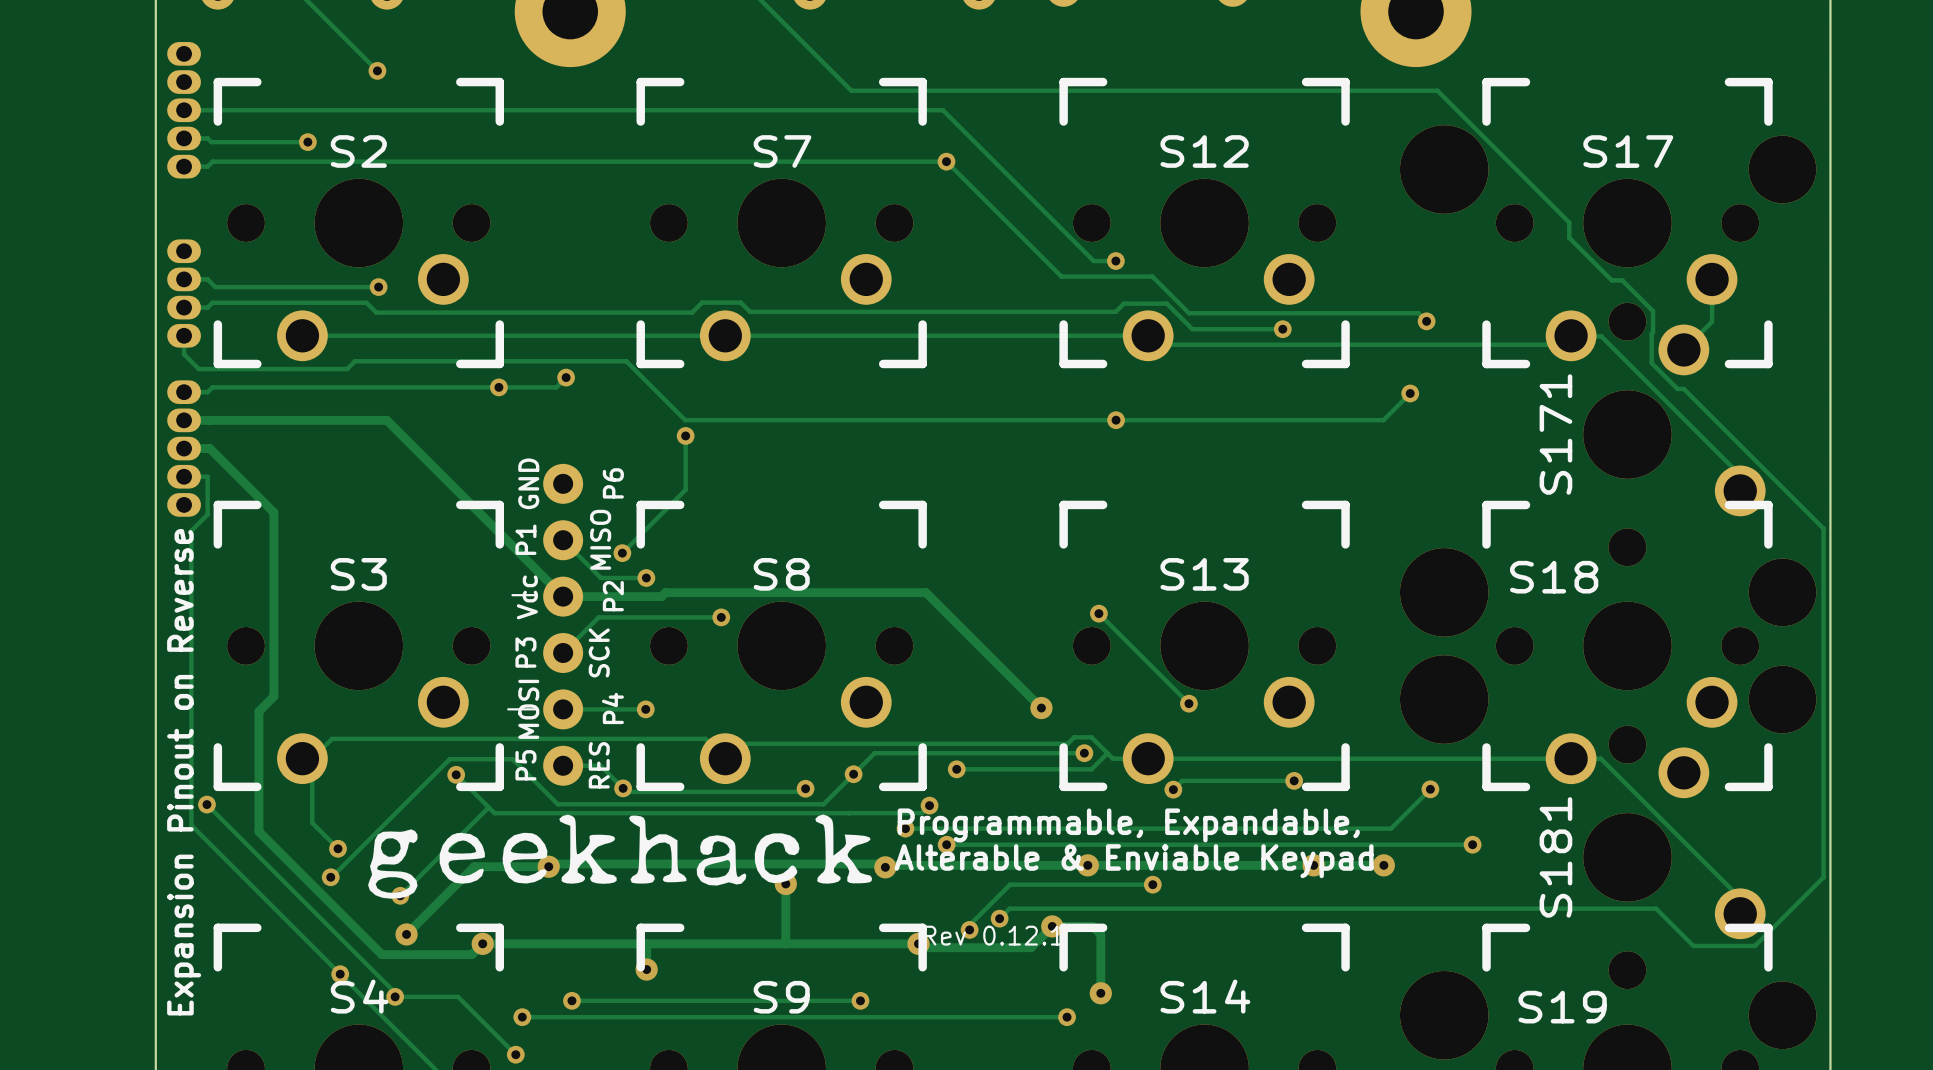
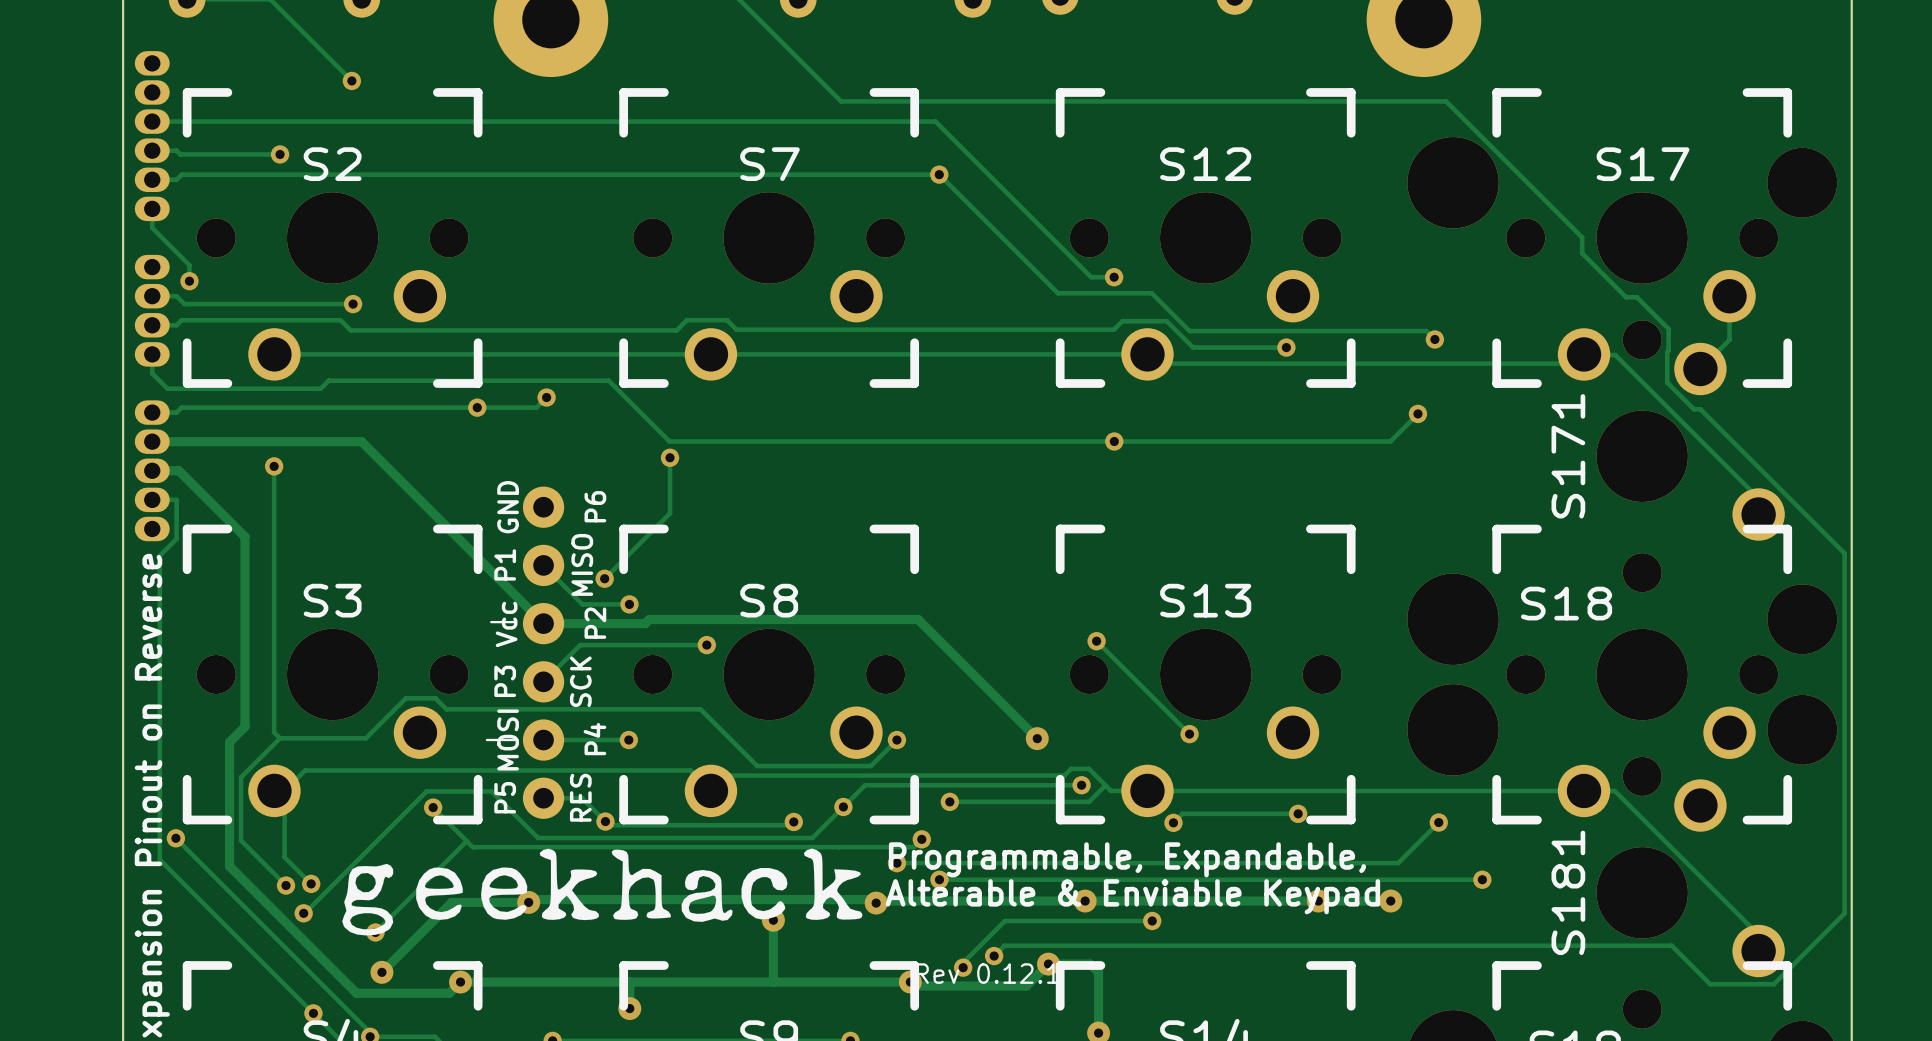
track: none -> (152, 208) (152, 227) (189, 265) (189, 281)
part: none -> (152, 208)
via: none -> (189, 281)
track: none -> (274, 466) (274, 732) (280, 738)
via: none -> (274, 466)
track: none -> (280, 738) (365, 738) (405, 698) (435, 698) (446, 709) (700, 709) (757, 766) (870, 766) (896, 740)
track: none -> (280, 738) (241, 777) (241, 840) (286, 885)
via: none -> (896, 740)
via: none -> (286, 885)

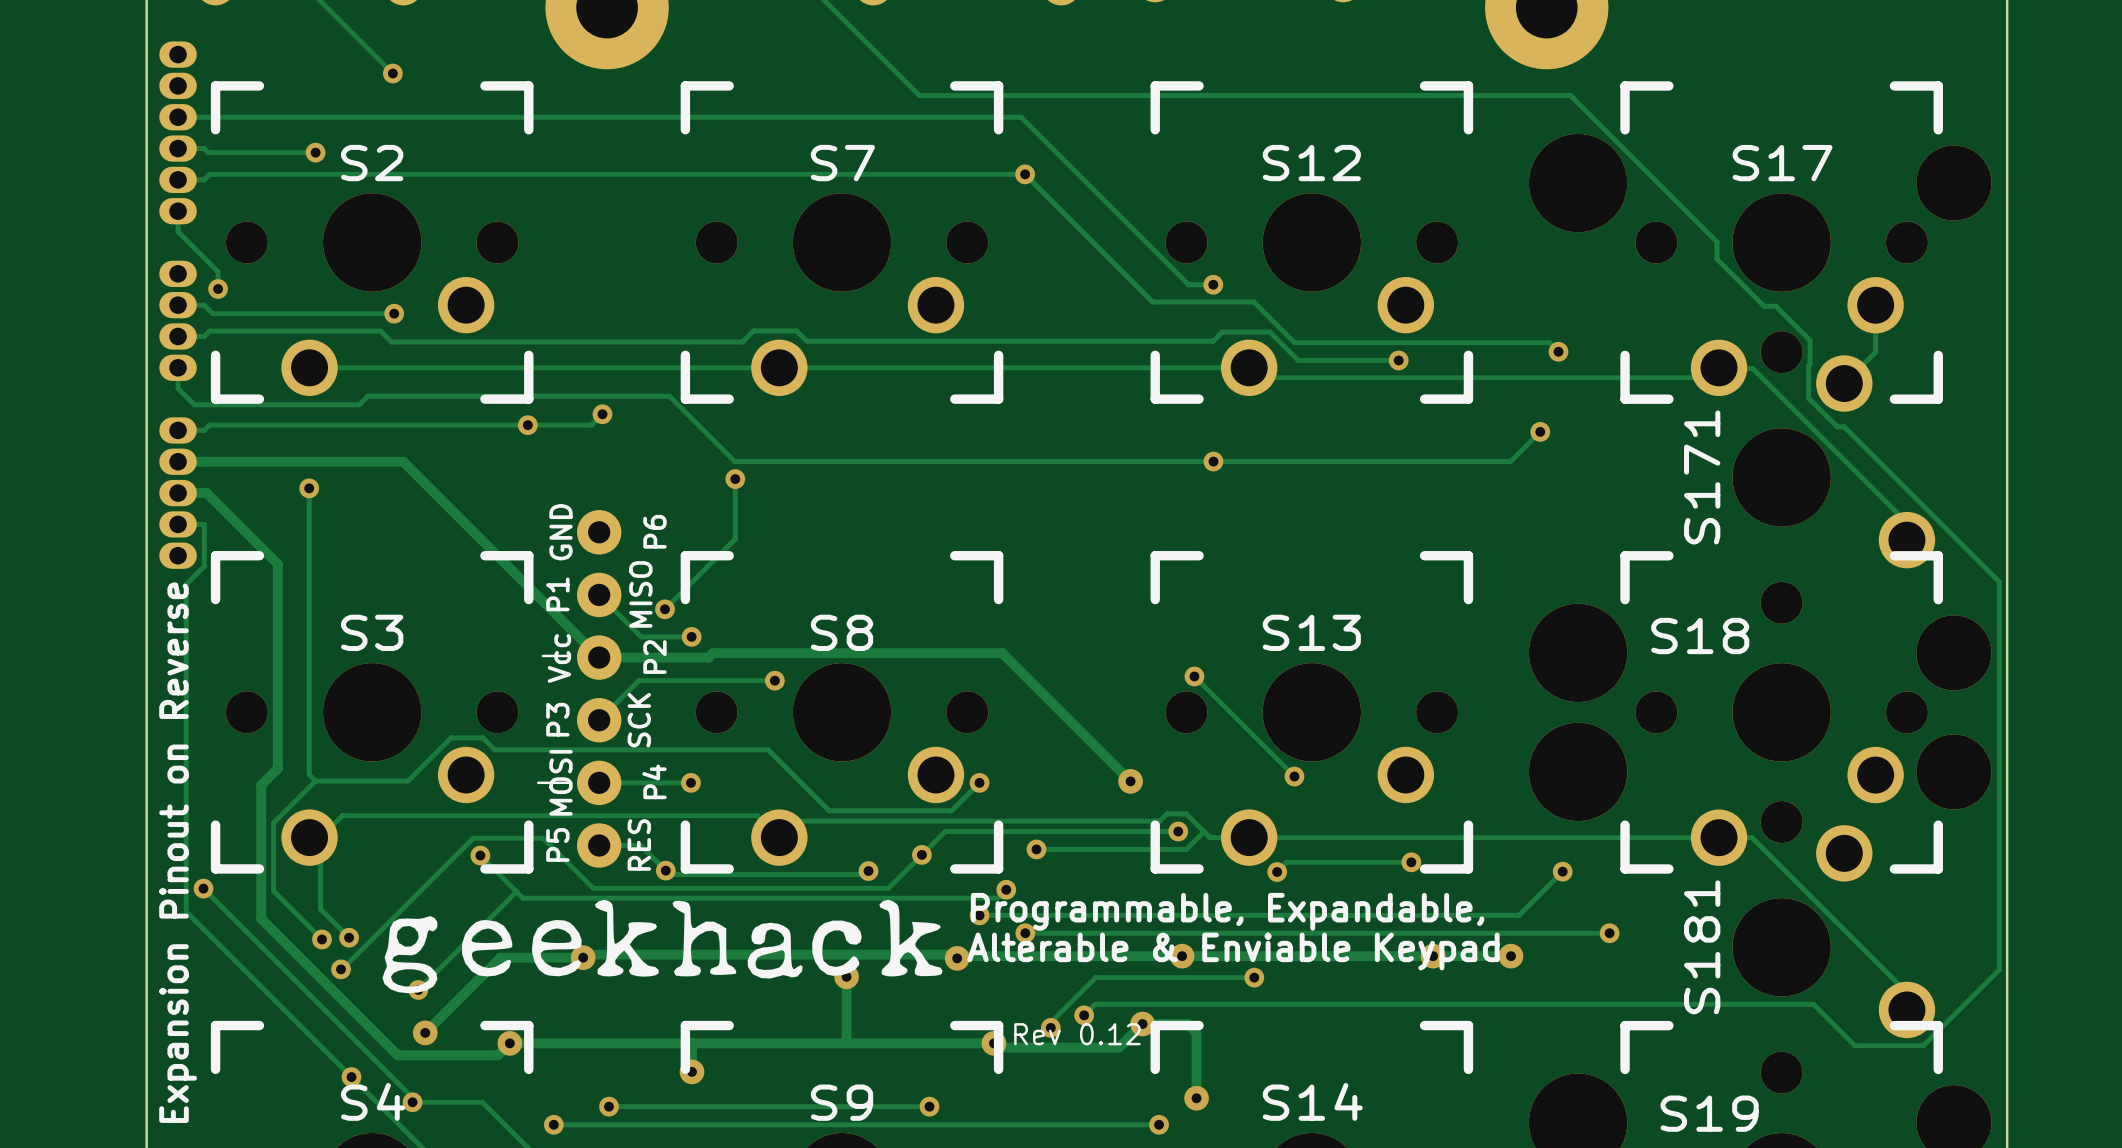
text: Rev 0.12.1 (987, 973) -> Rev 0.12 (1077, 1034)

